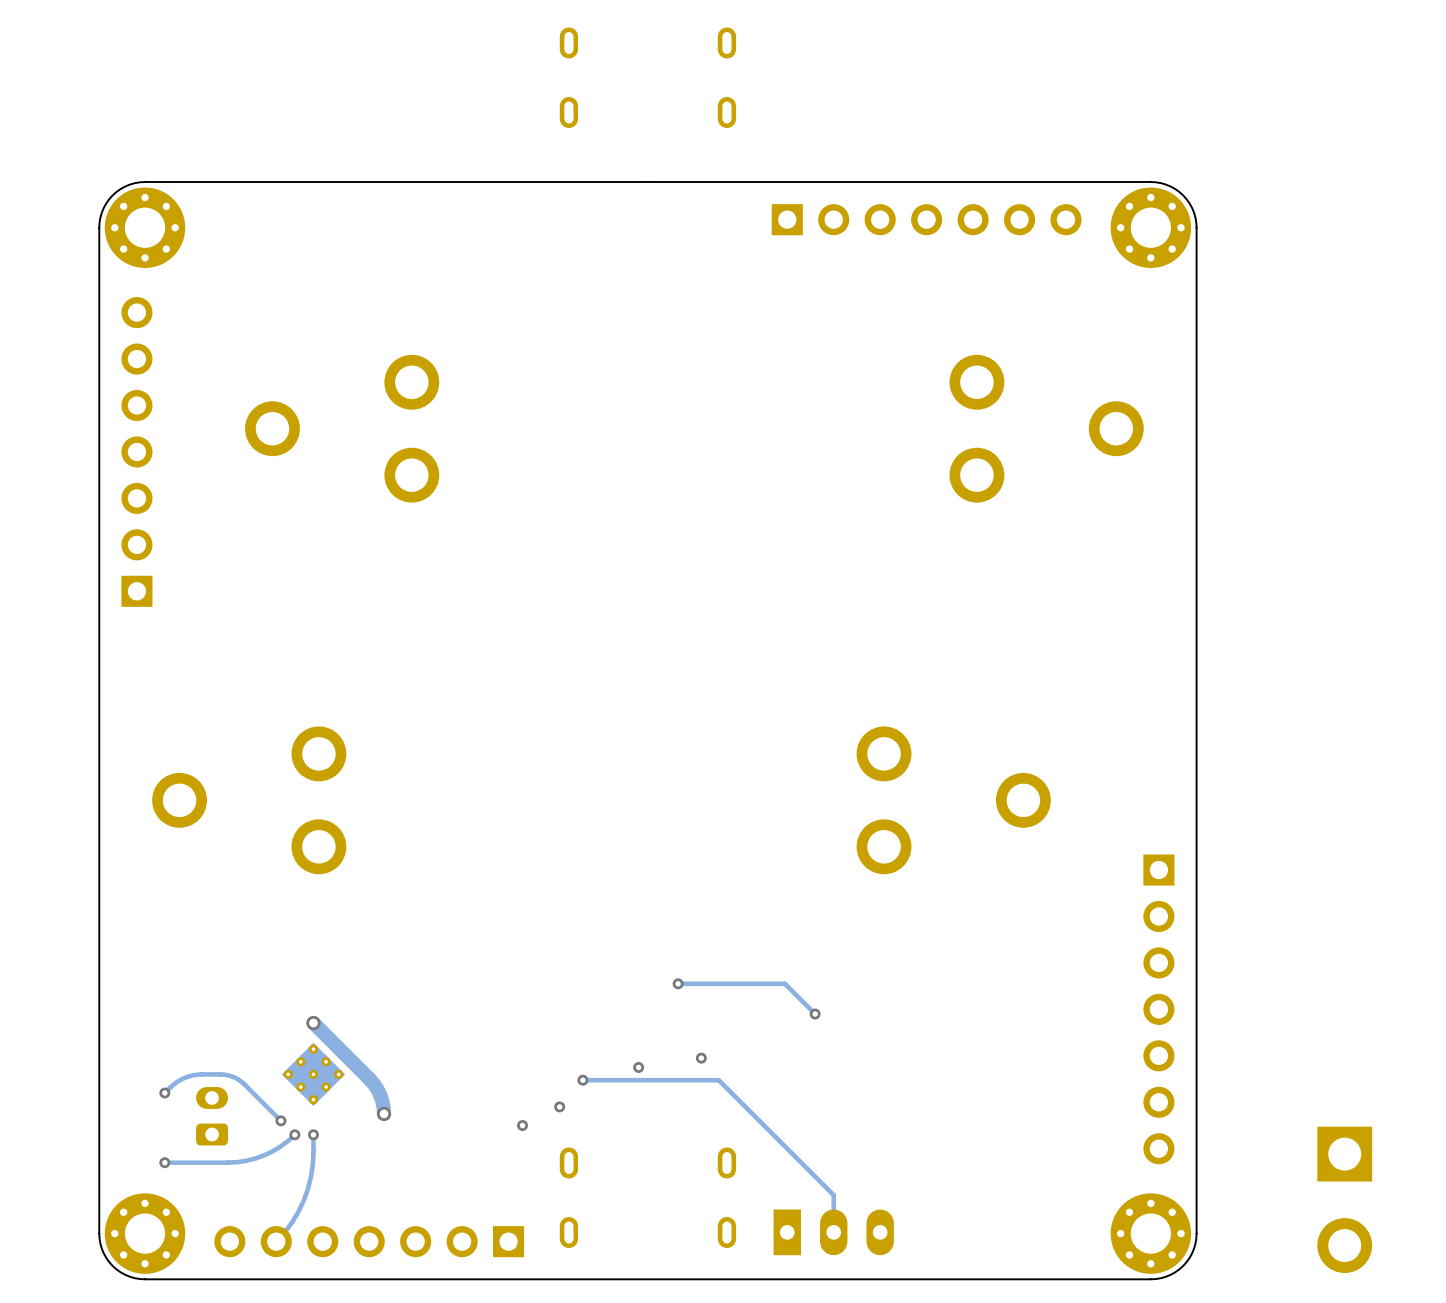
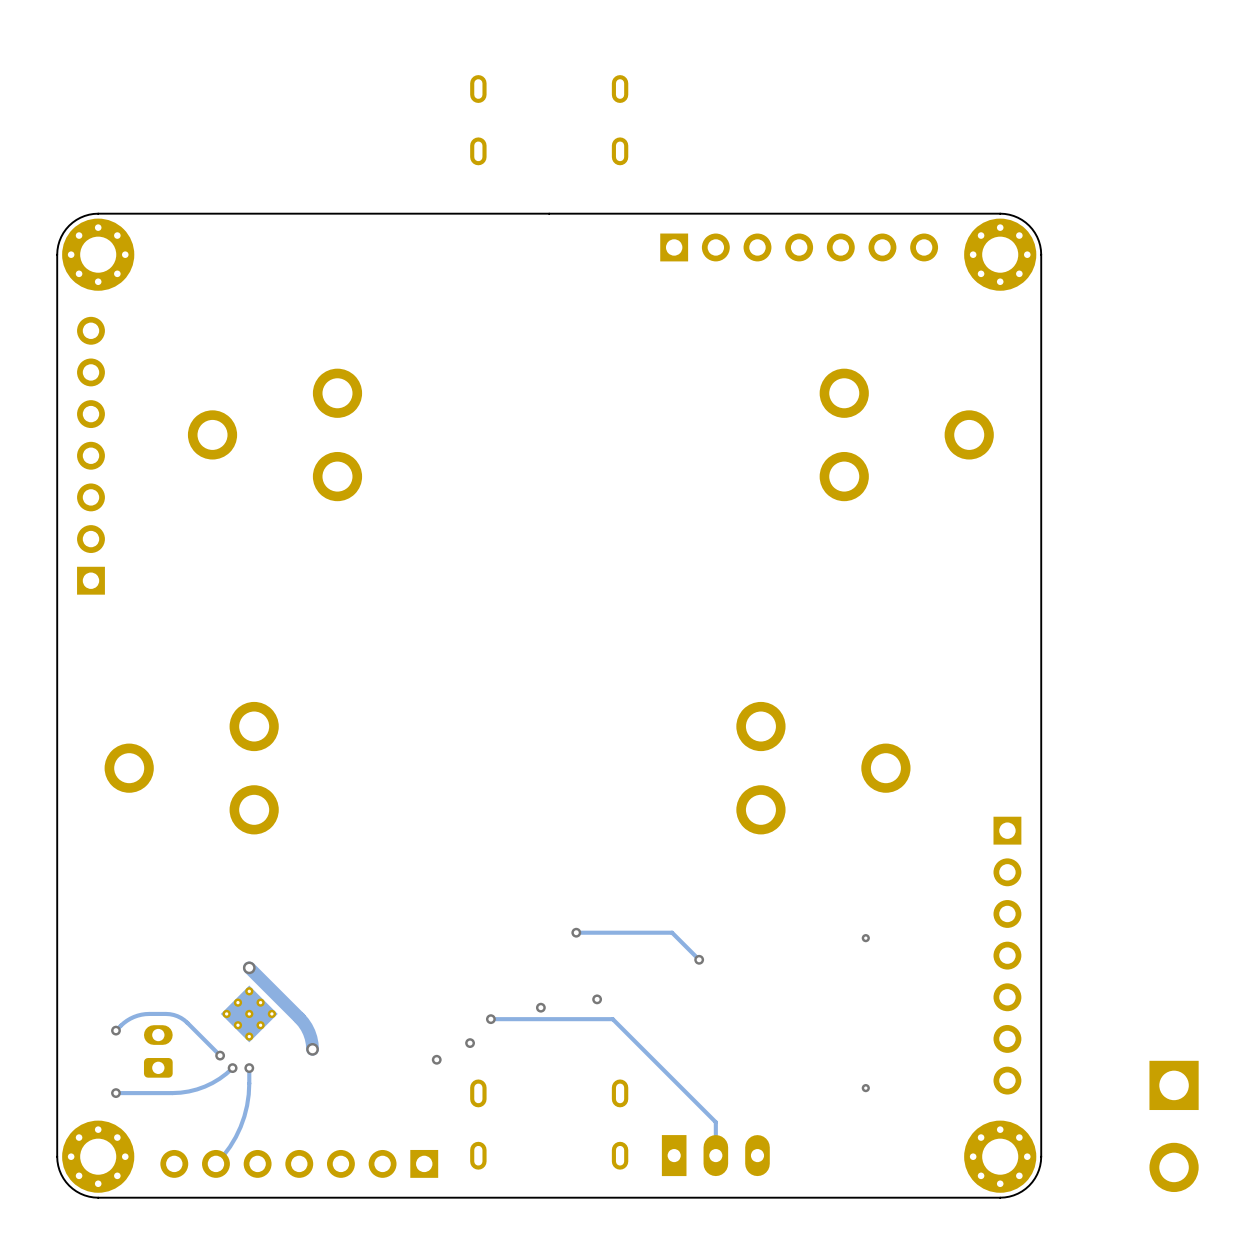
via: none -> (865, 938)
via: none -> (865, 1088)

